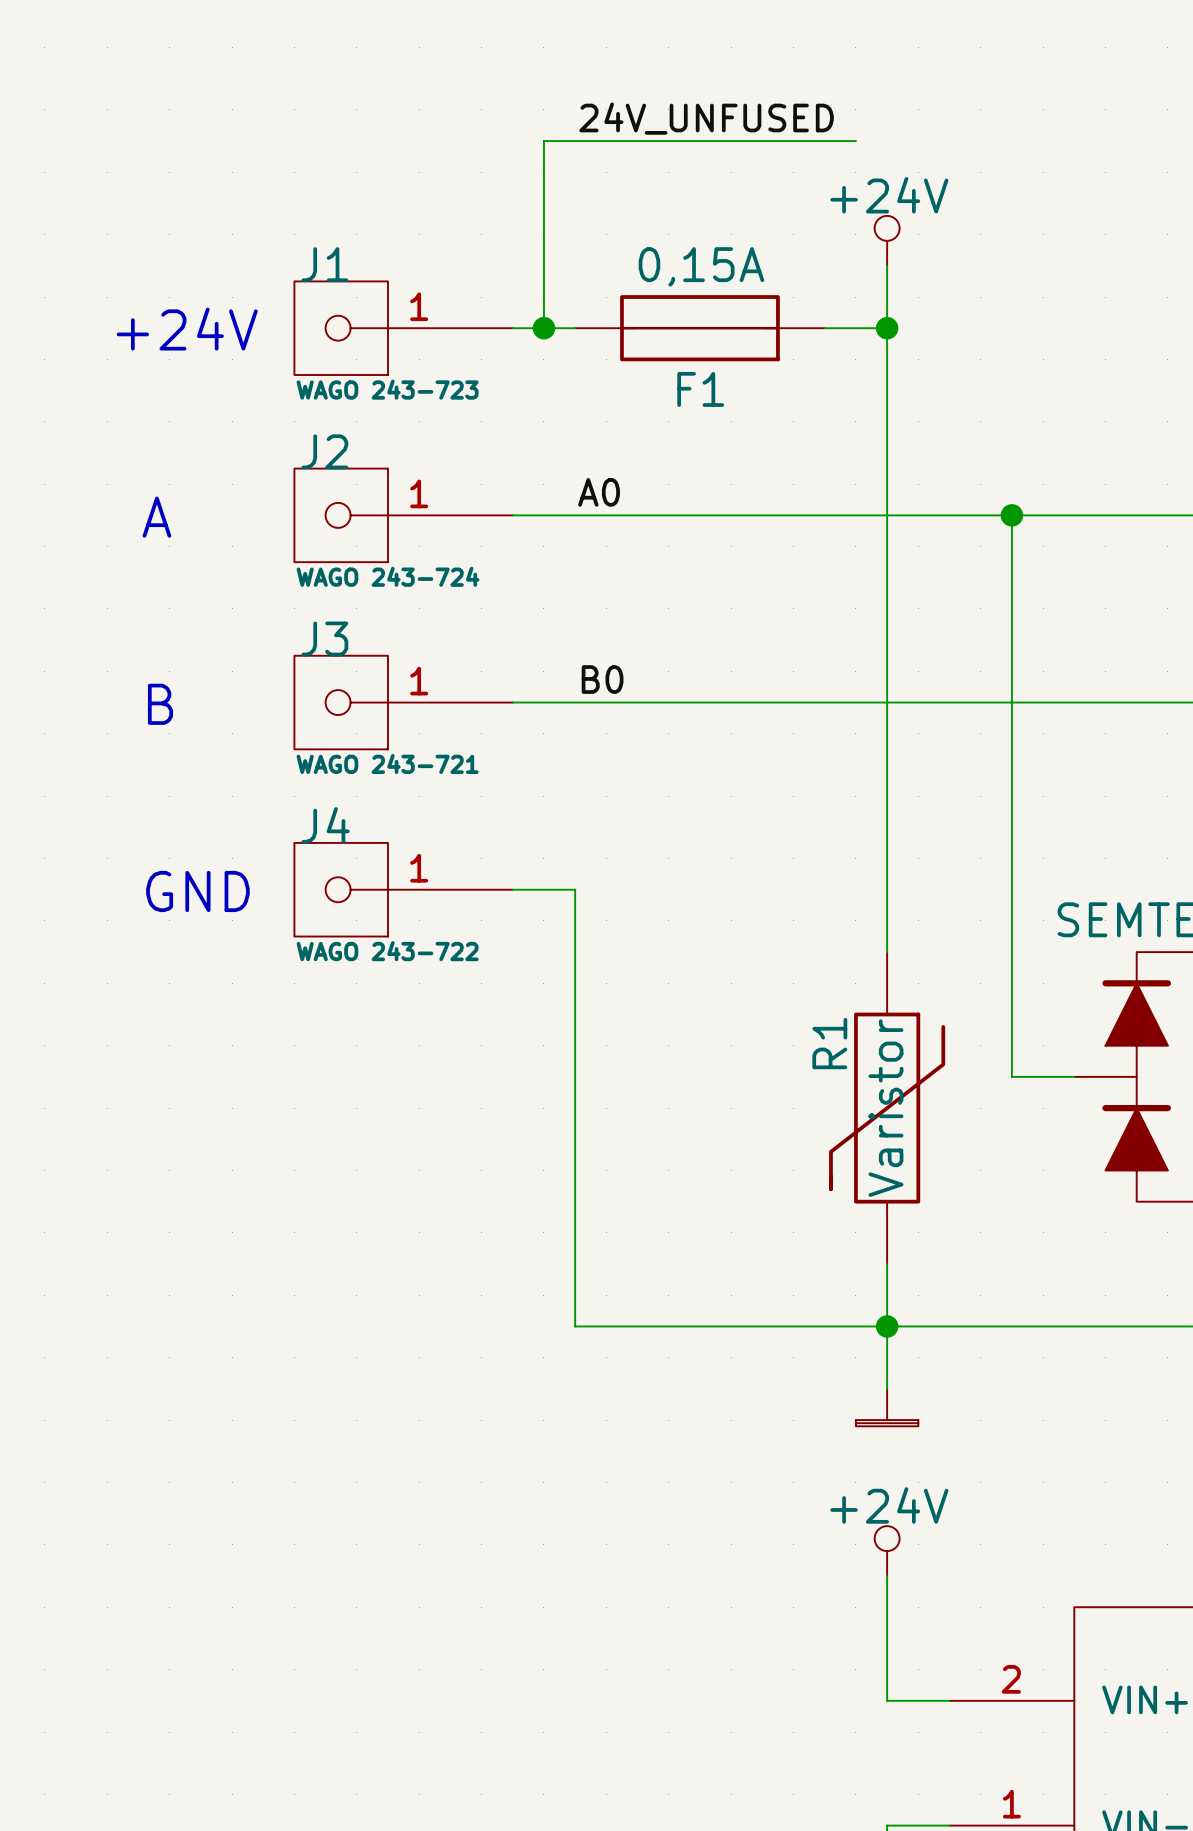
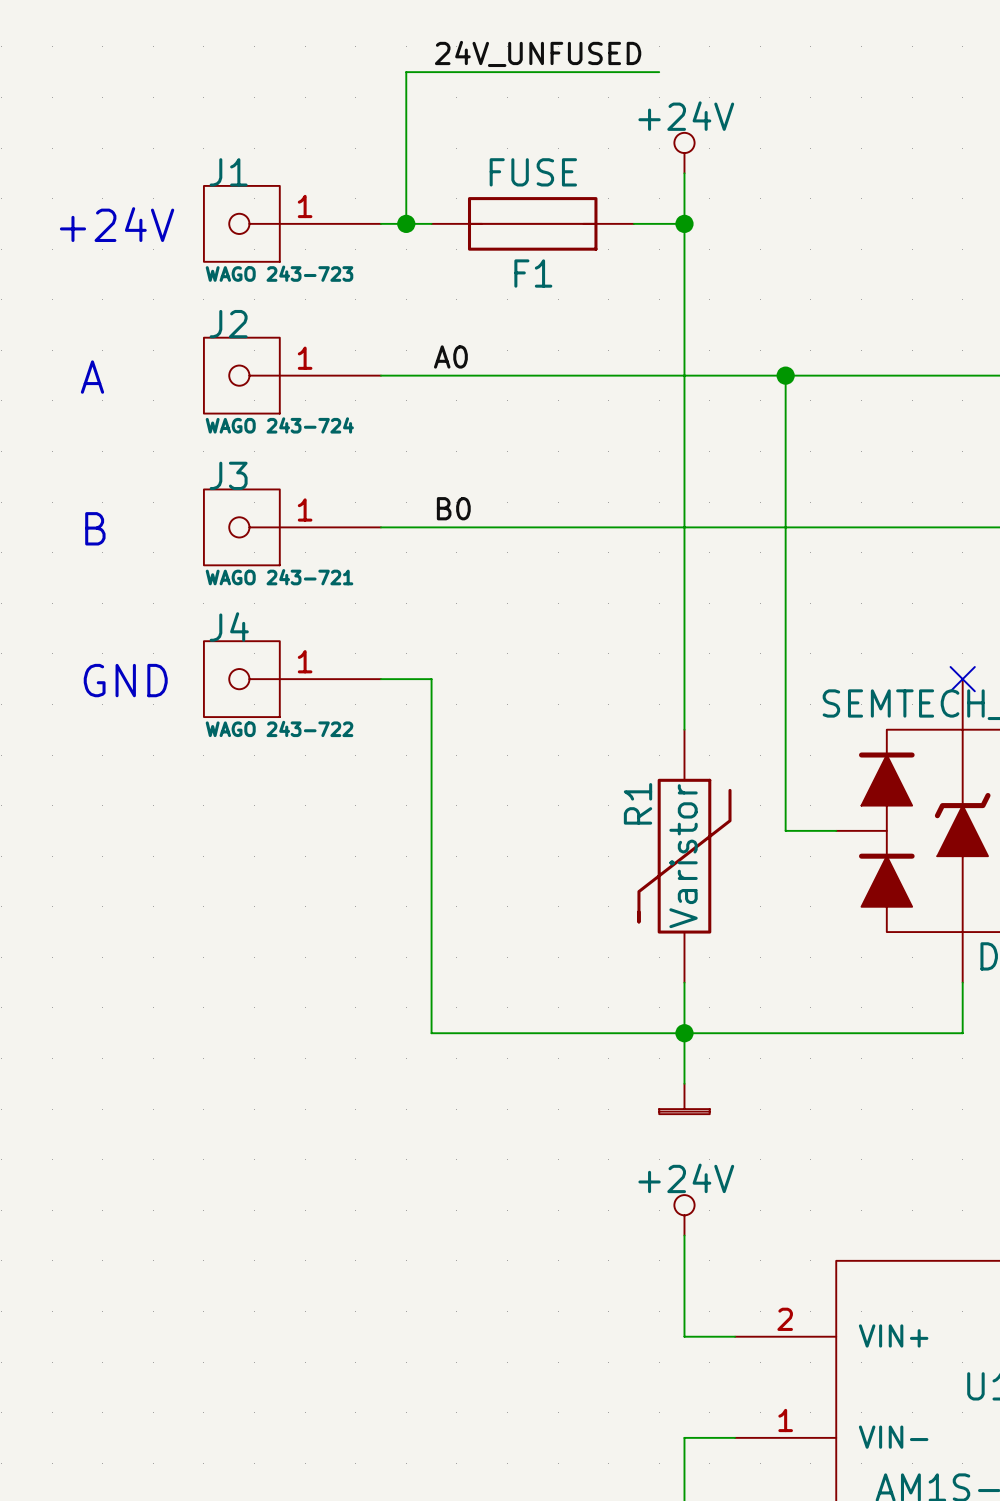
F1 value: 0,15A (701, 266) -> FUSE (533, 172)

